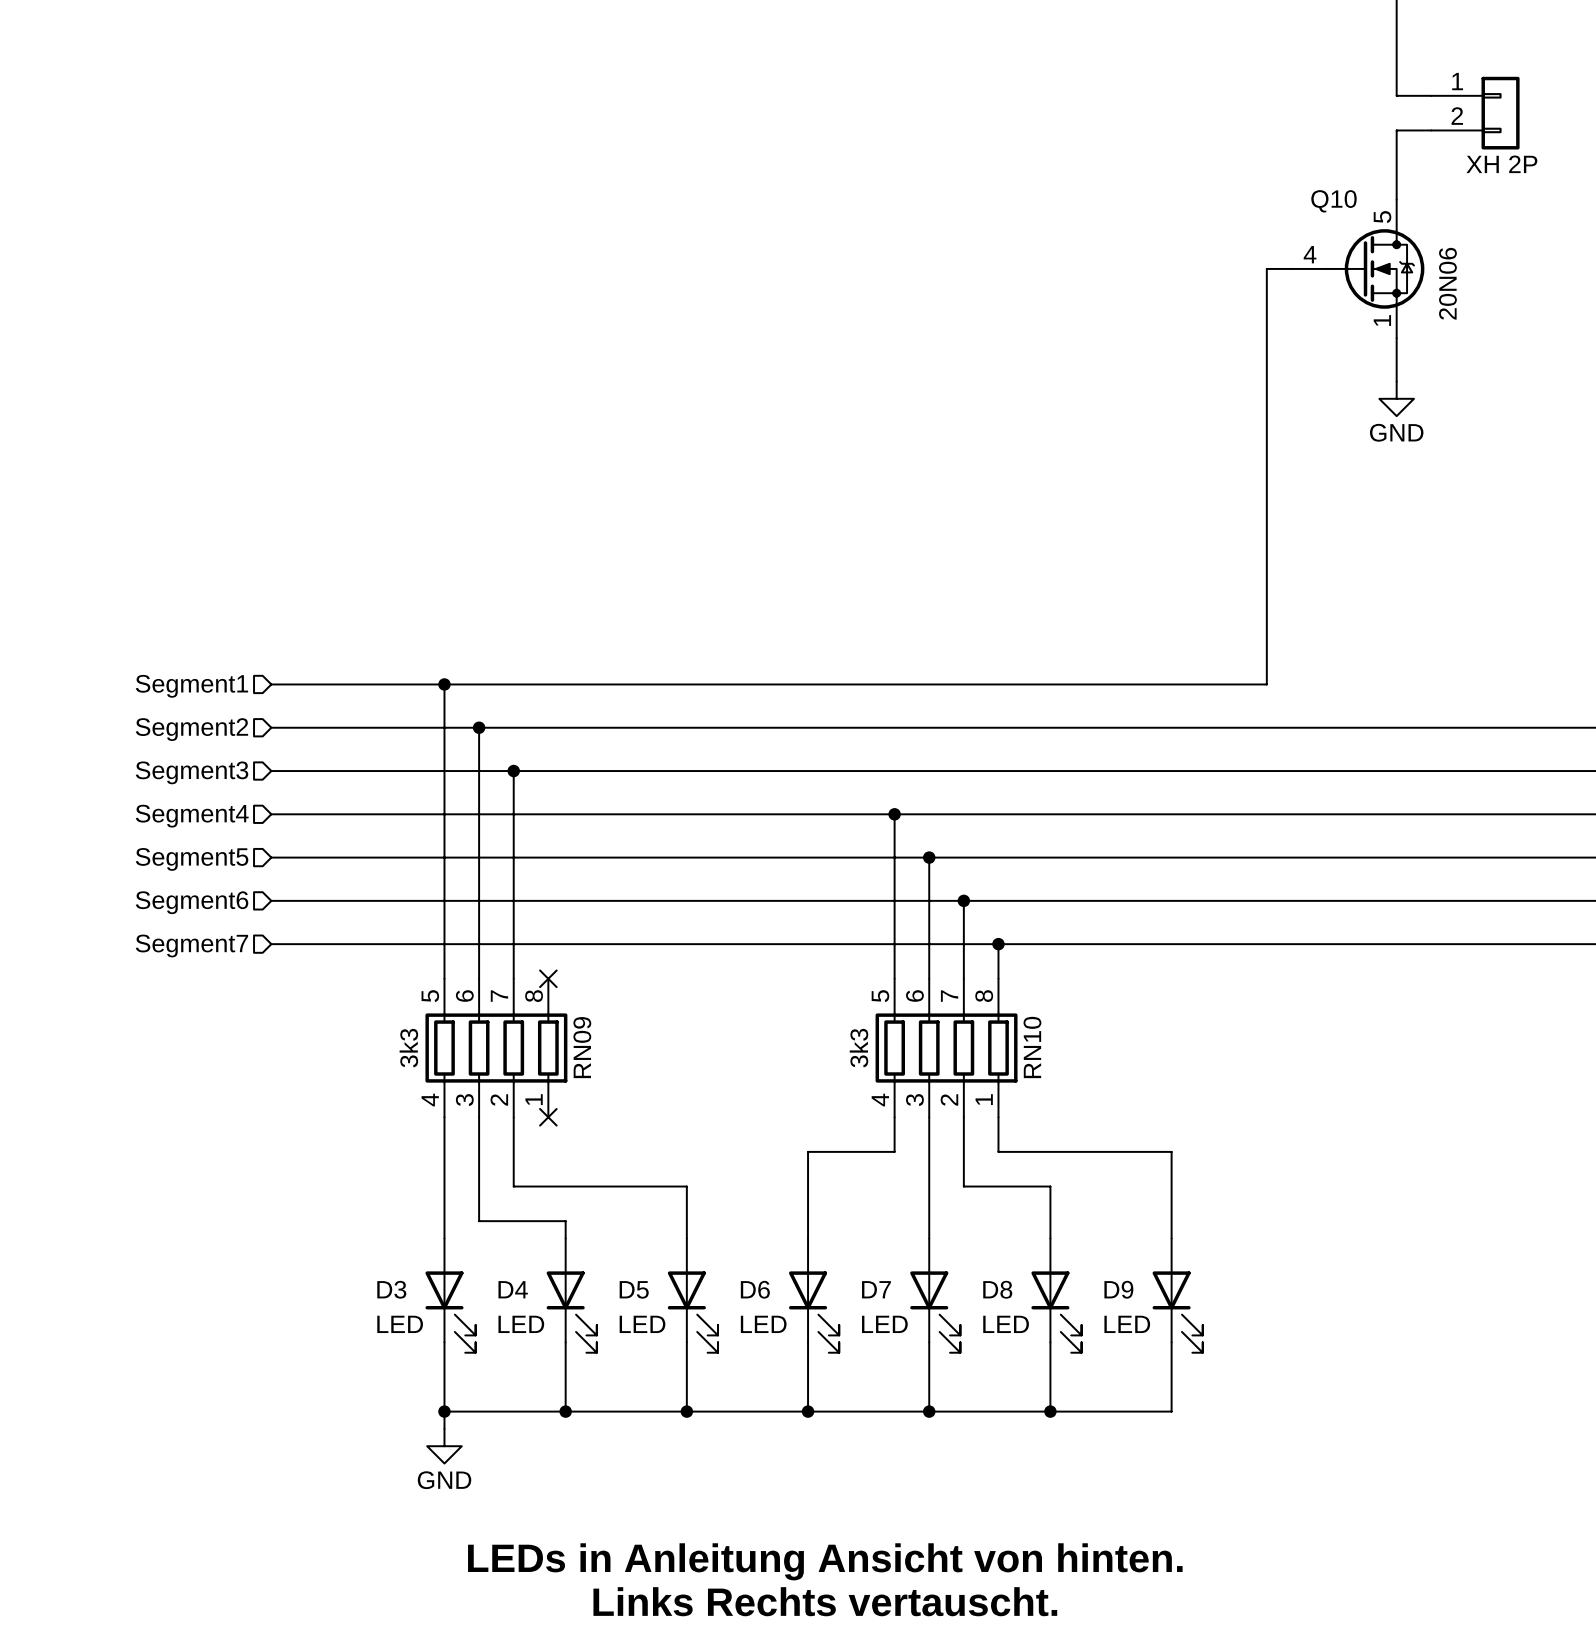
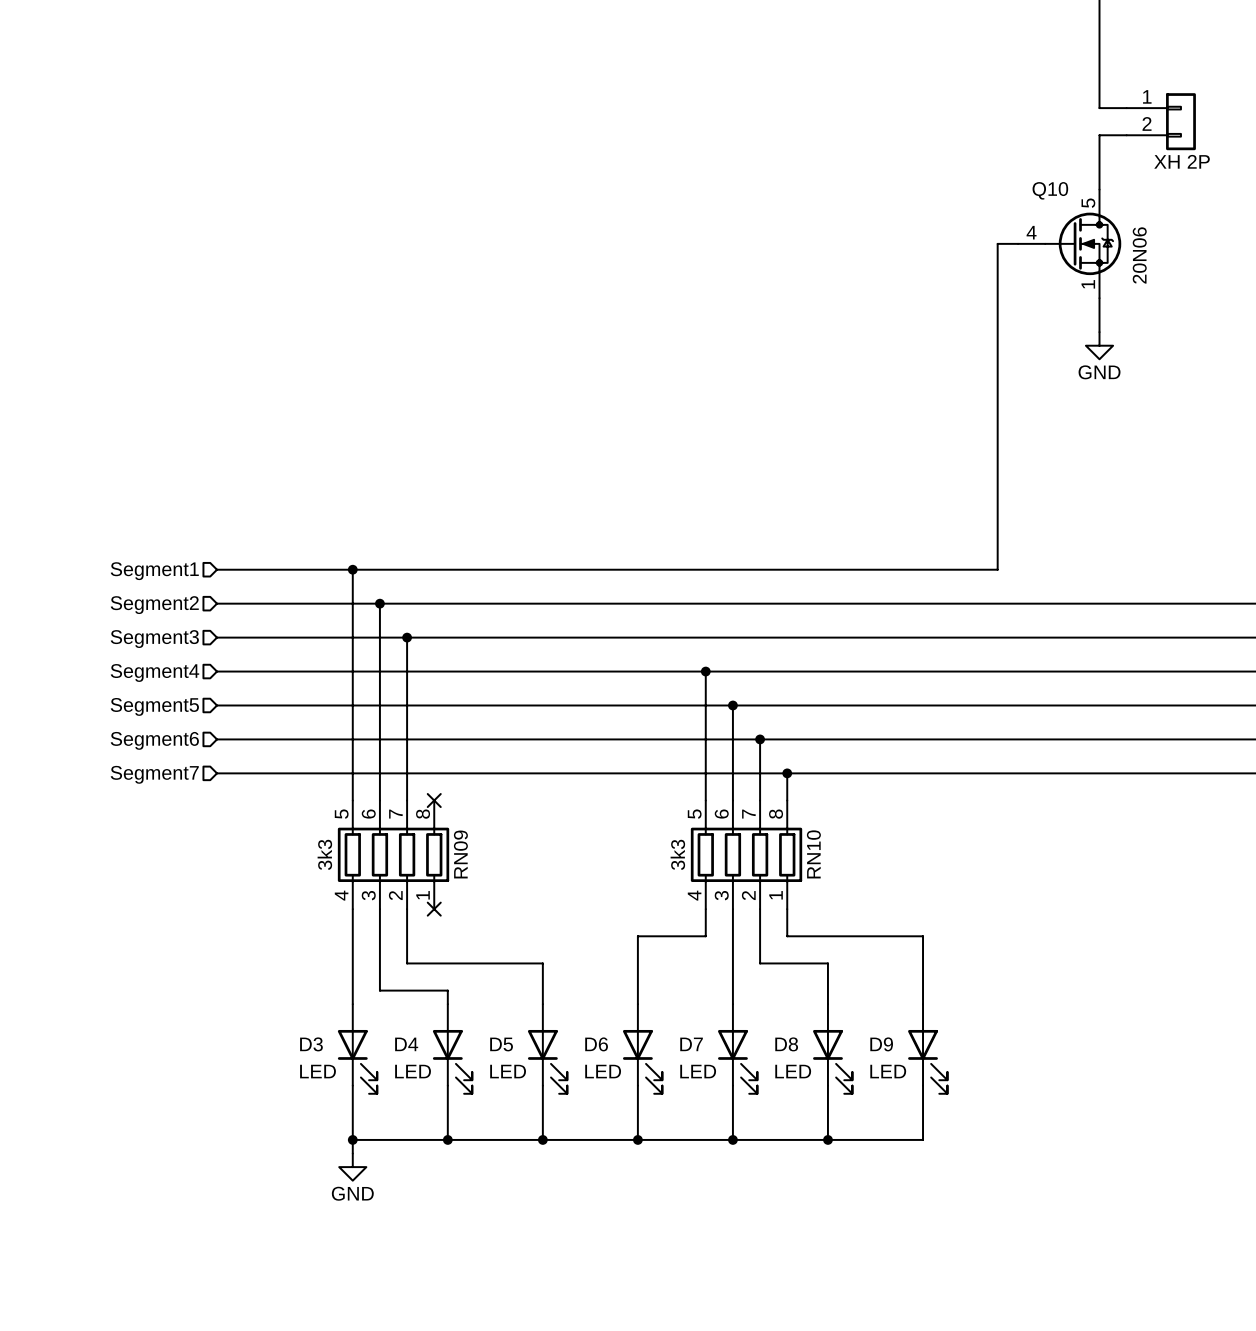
text: LEDs in Anleitung Ansicht von hinten. (825, 1561) -> none
text: Links Rechts vertauscht. (825, 1601) -> none

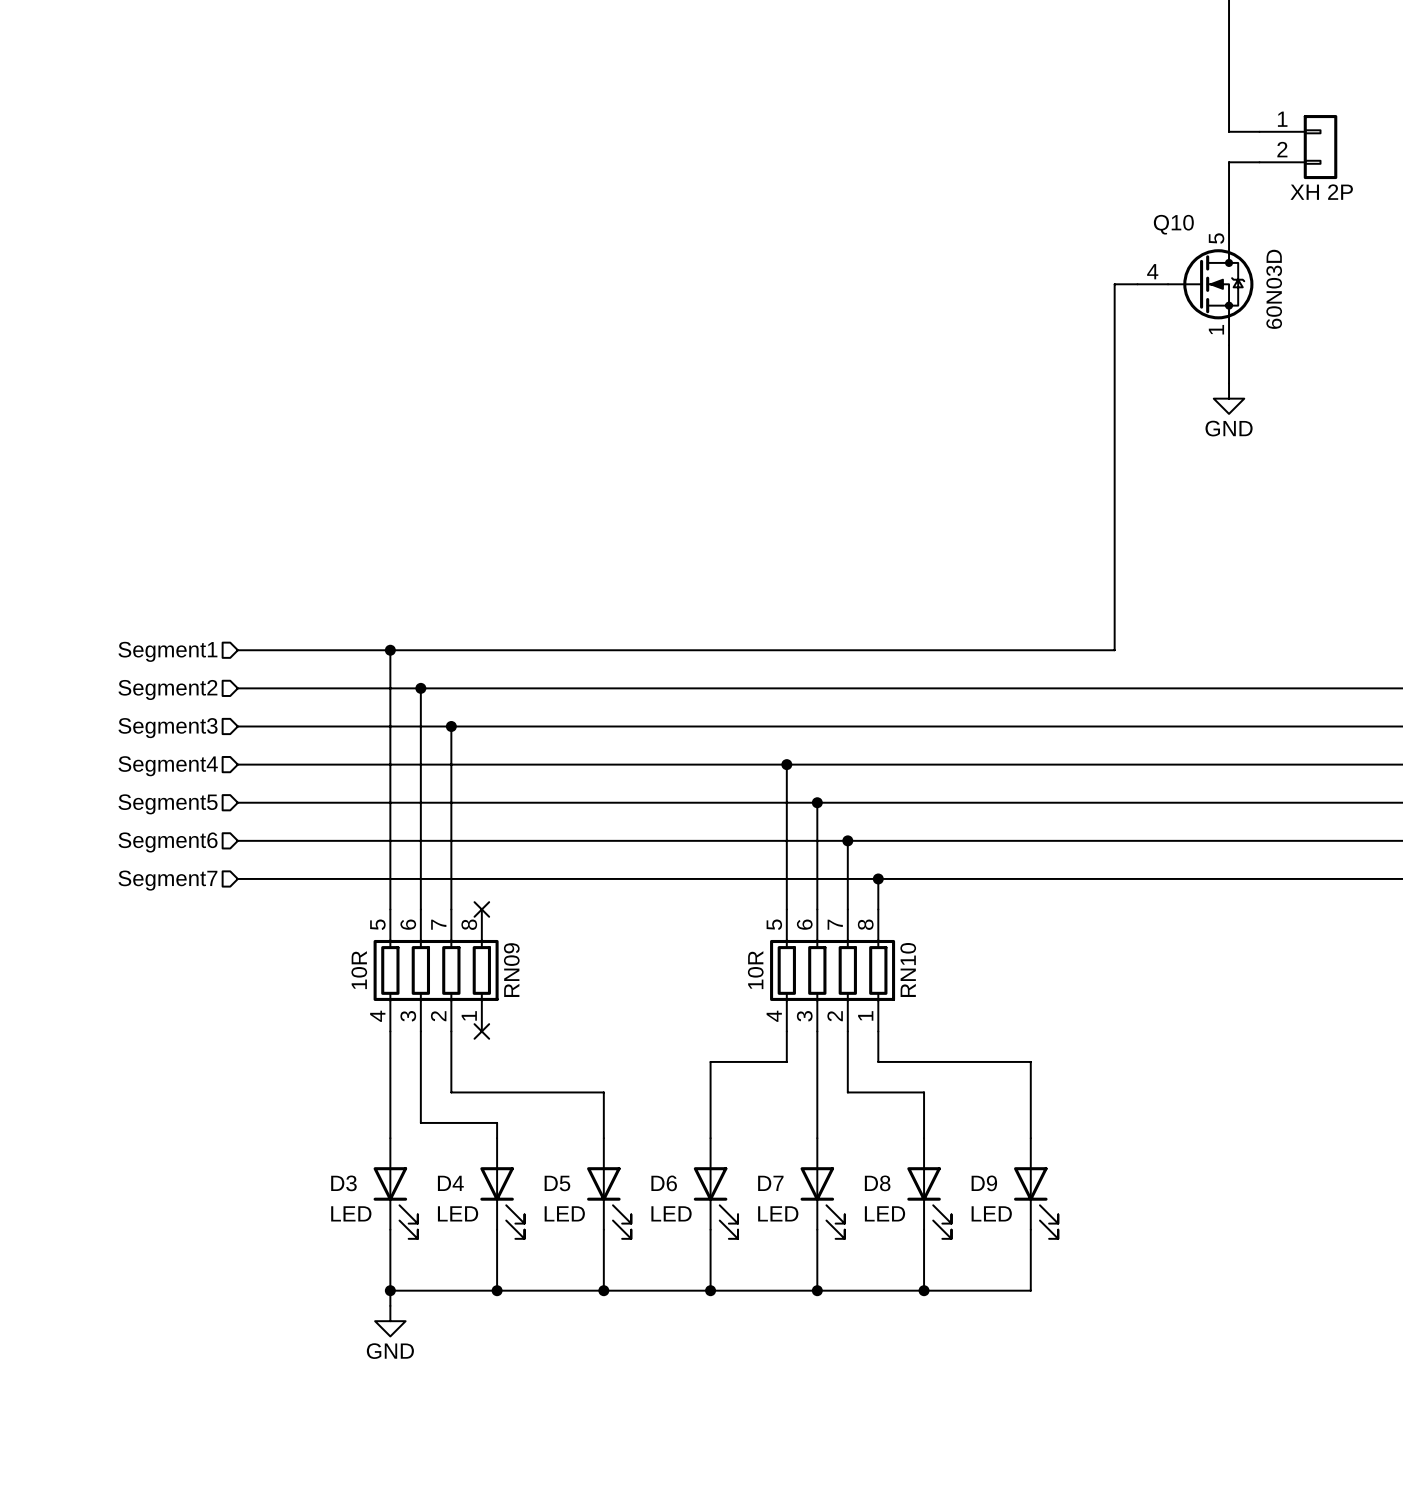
Q10 value: 20N06 (1139, 255) -> 60N03D (1274, 289)
RN09 value: 3k3 (324, 854) -> 10R (359, 970)
RN10 value: 3k3 (677, 854) -> 10R (755, 970)

